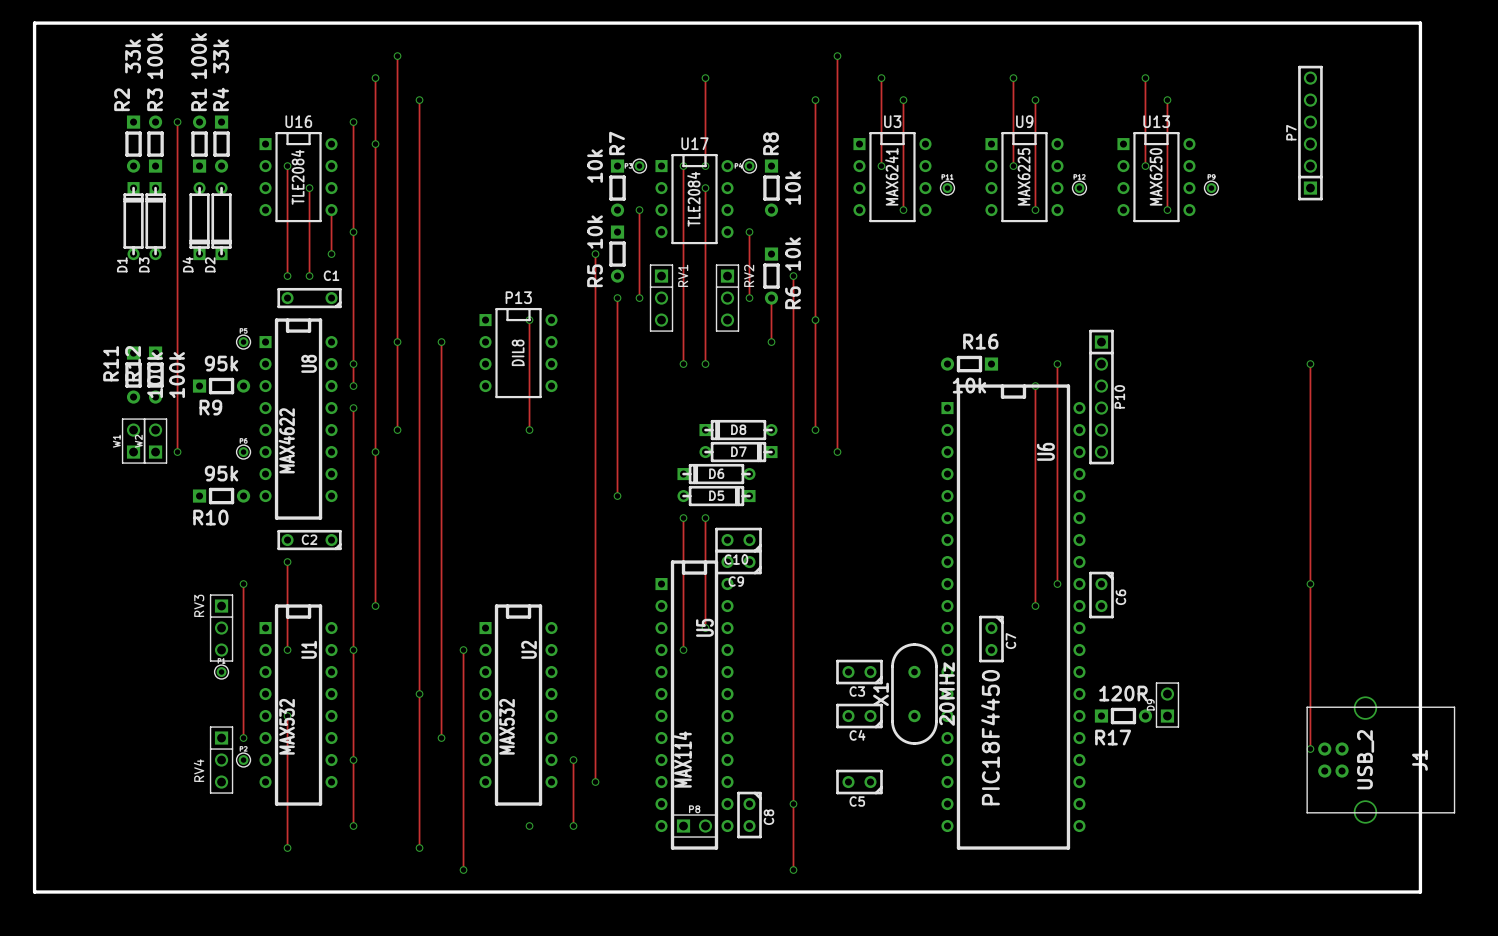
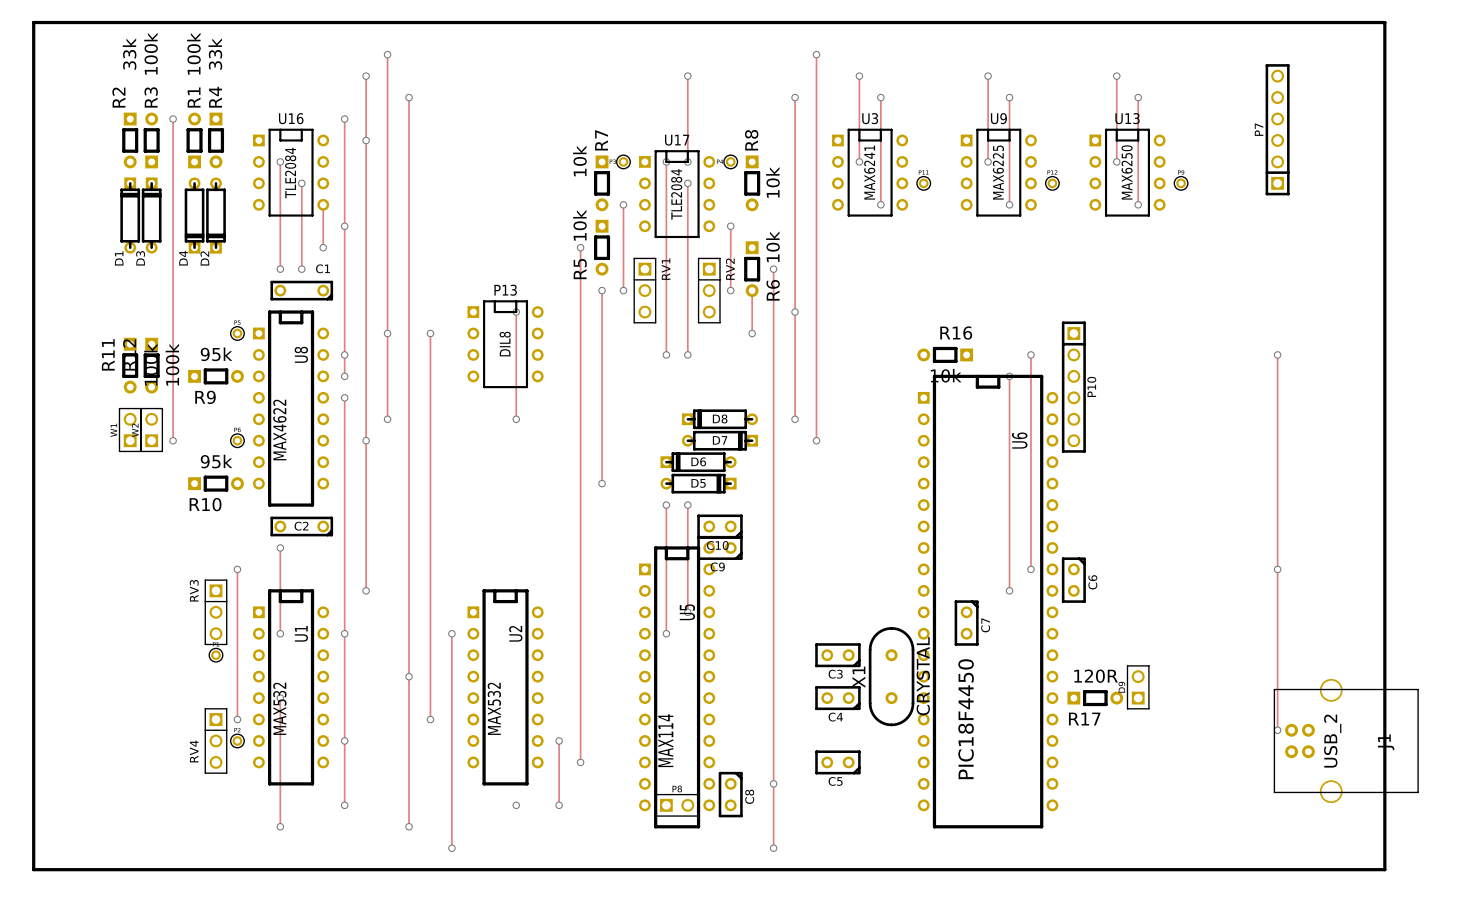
X1 value: 20MHz (946, 694) -> CRYSTAL (923, 676)

